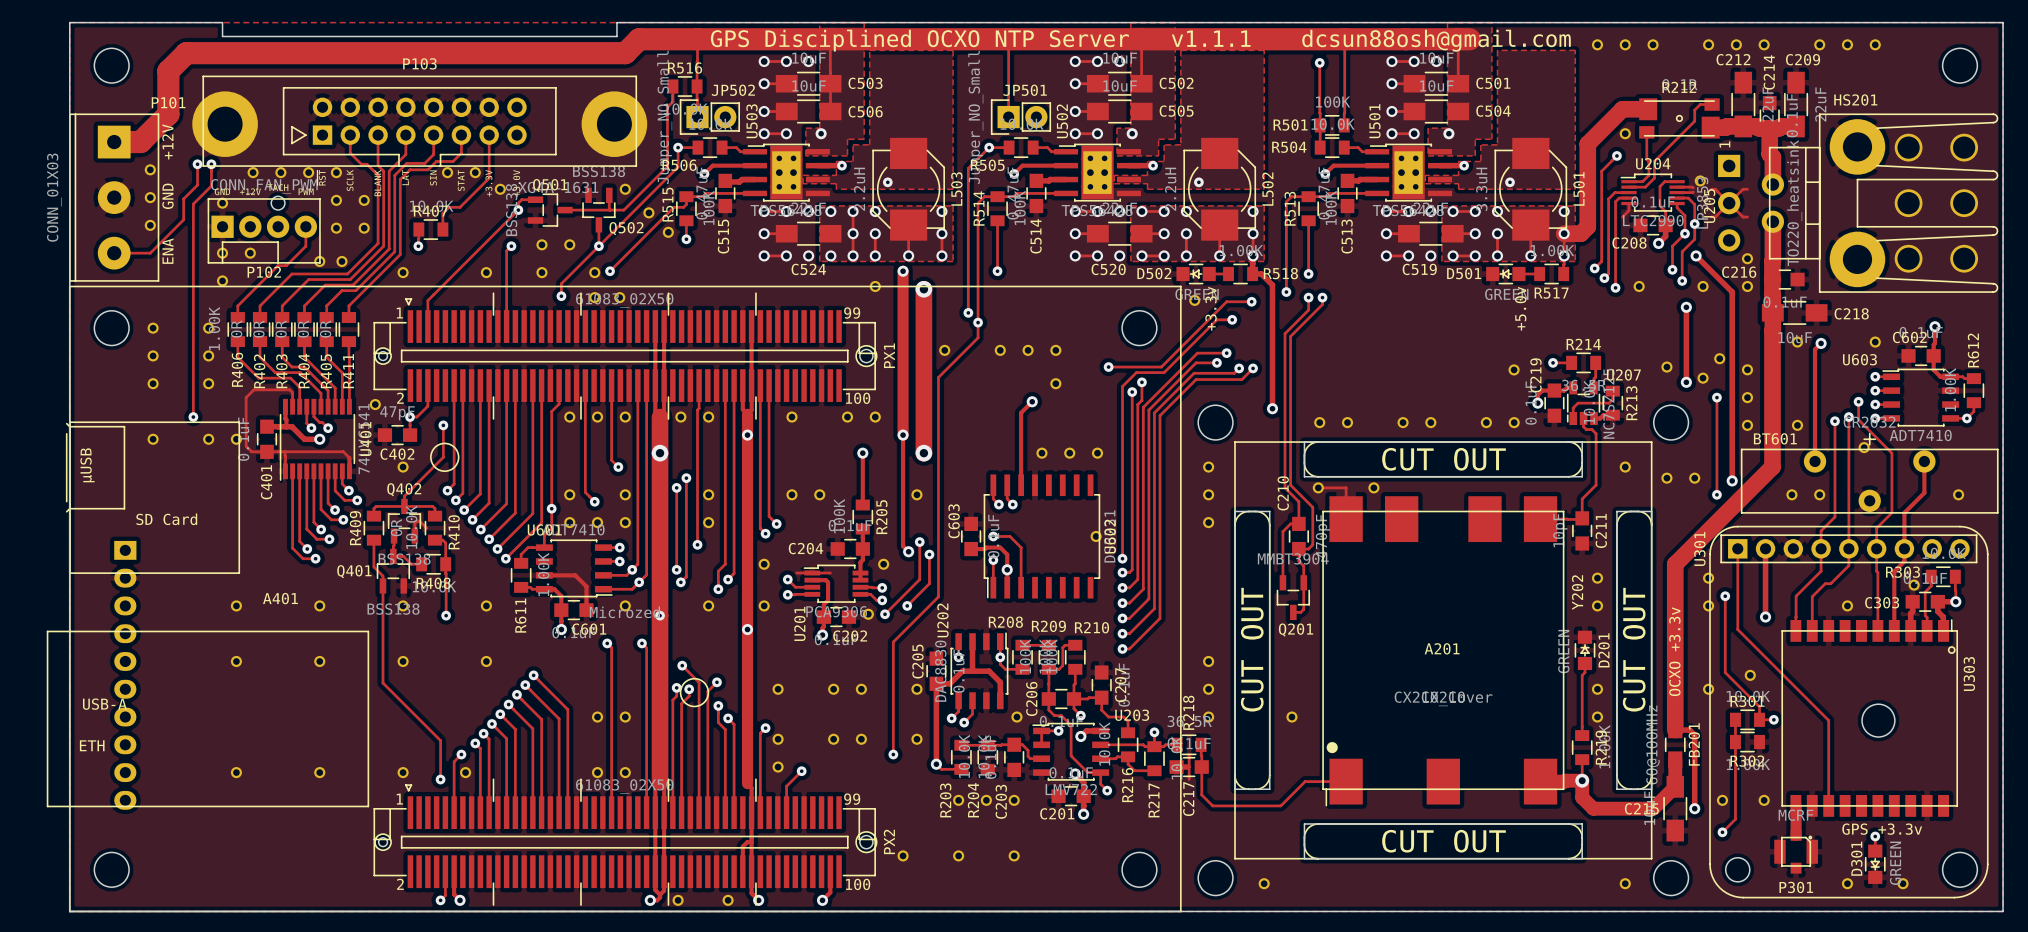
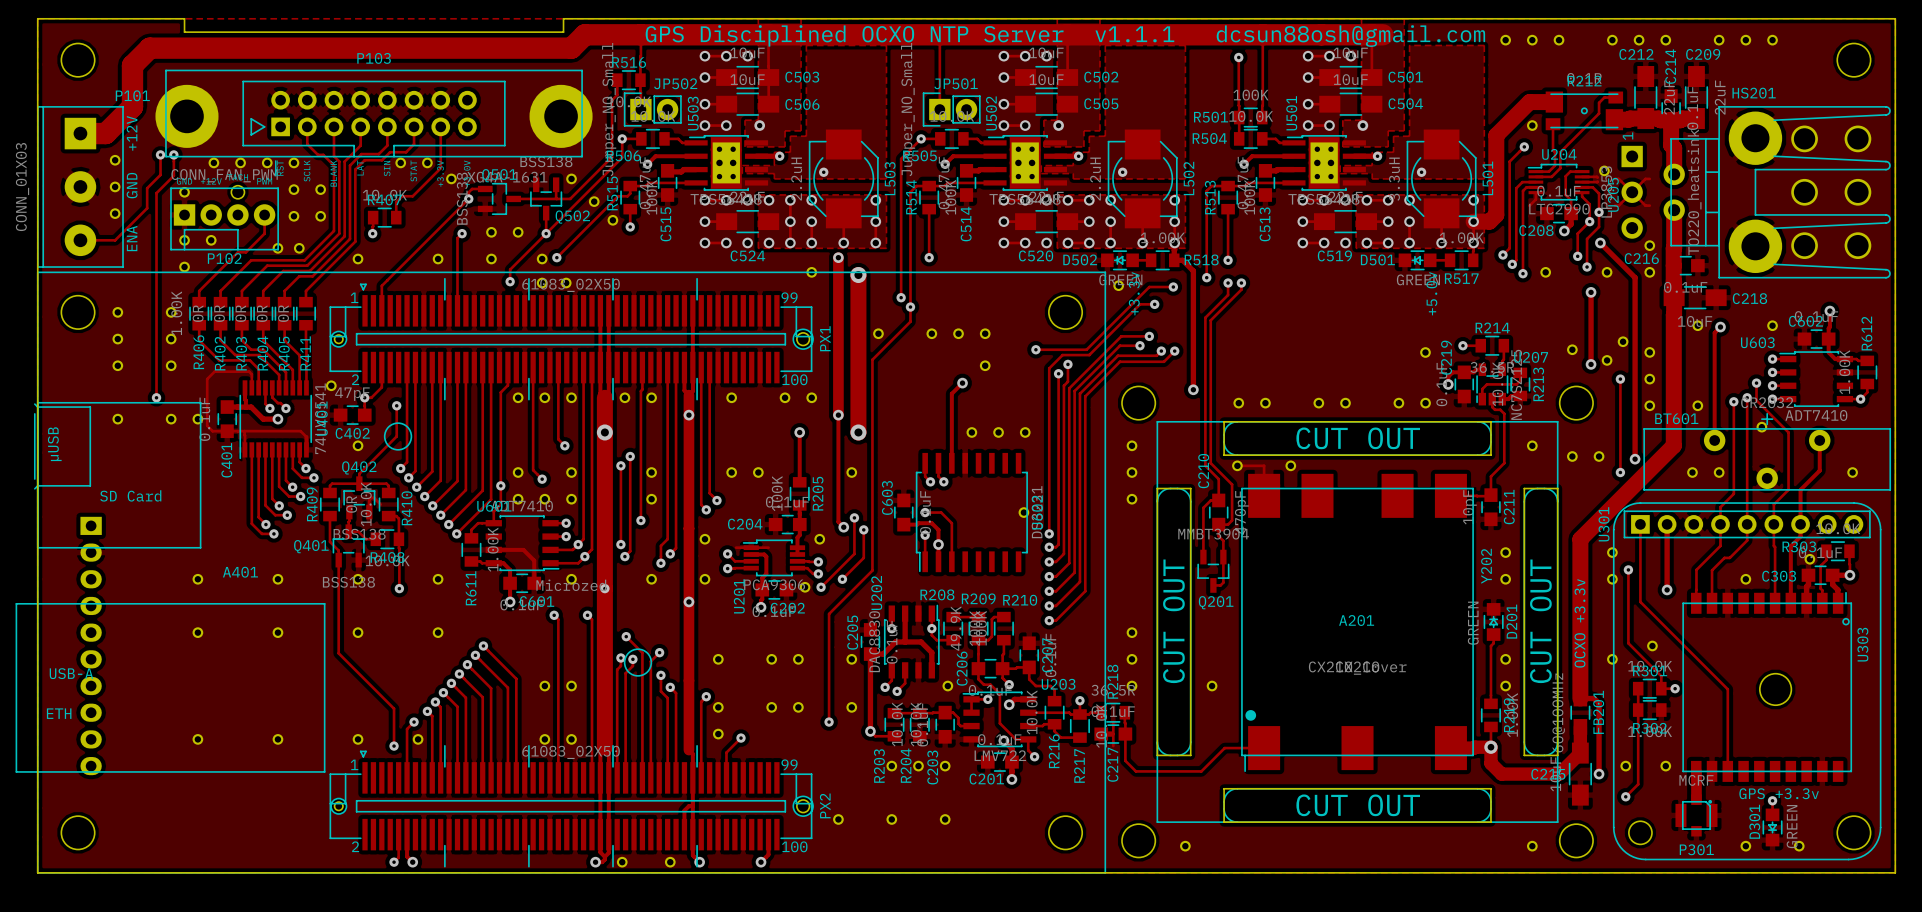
R209 value: 100K (1025, 656) -> 49.9K (956, 628)

